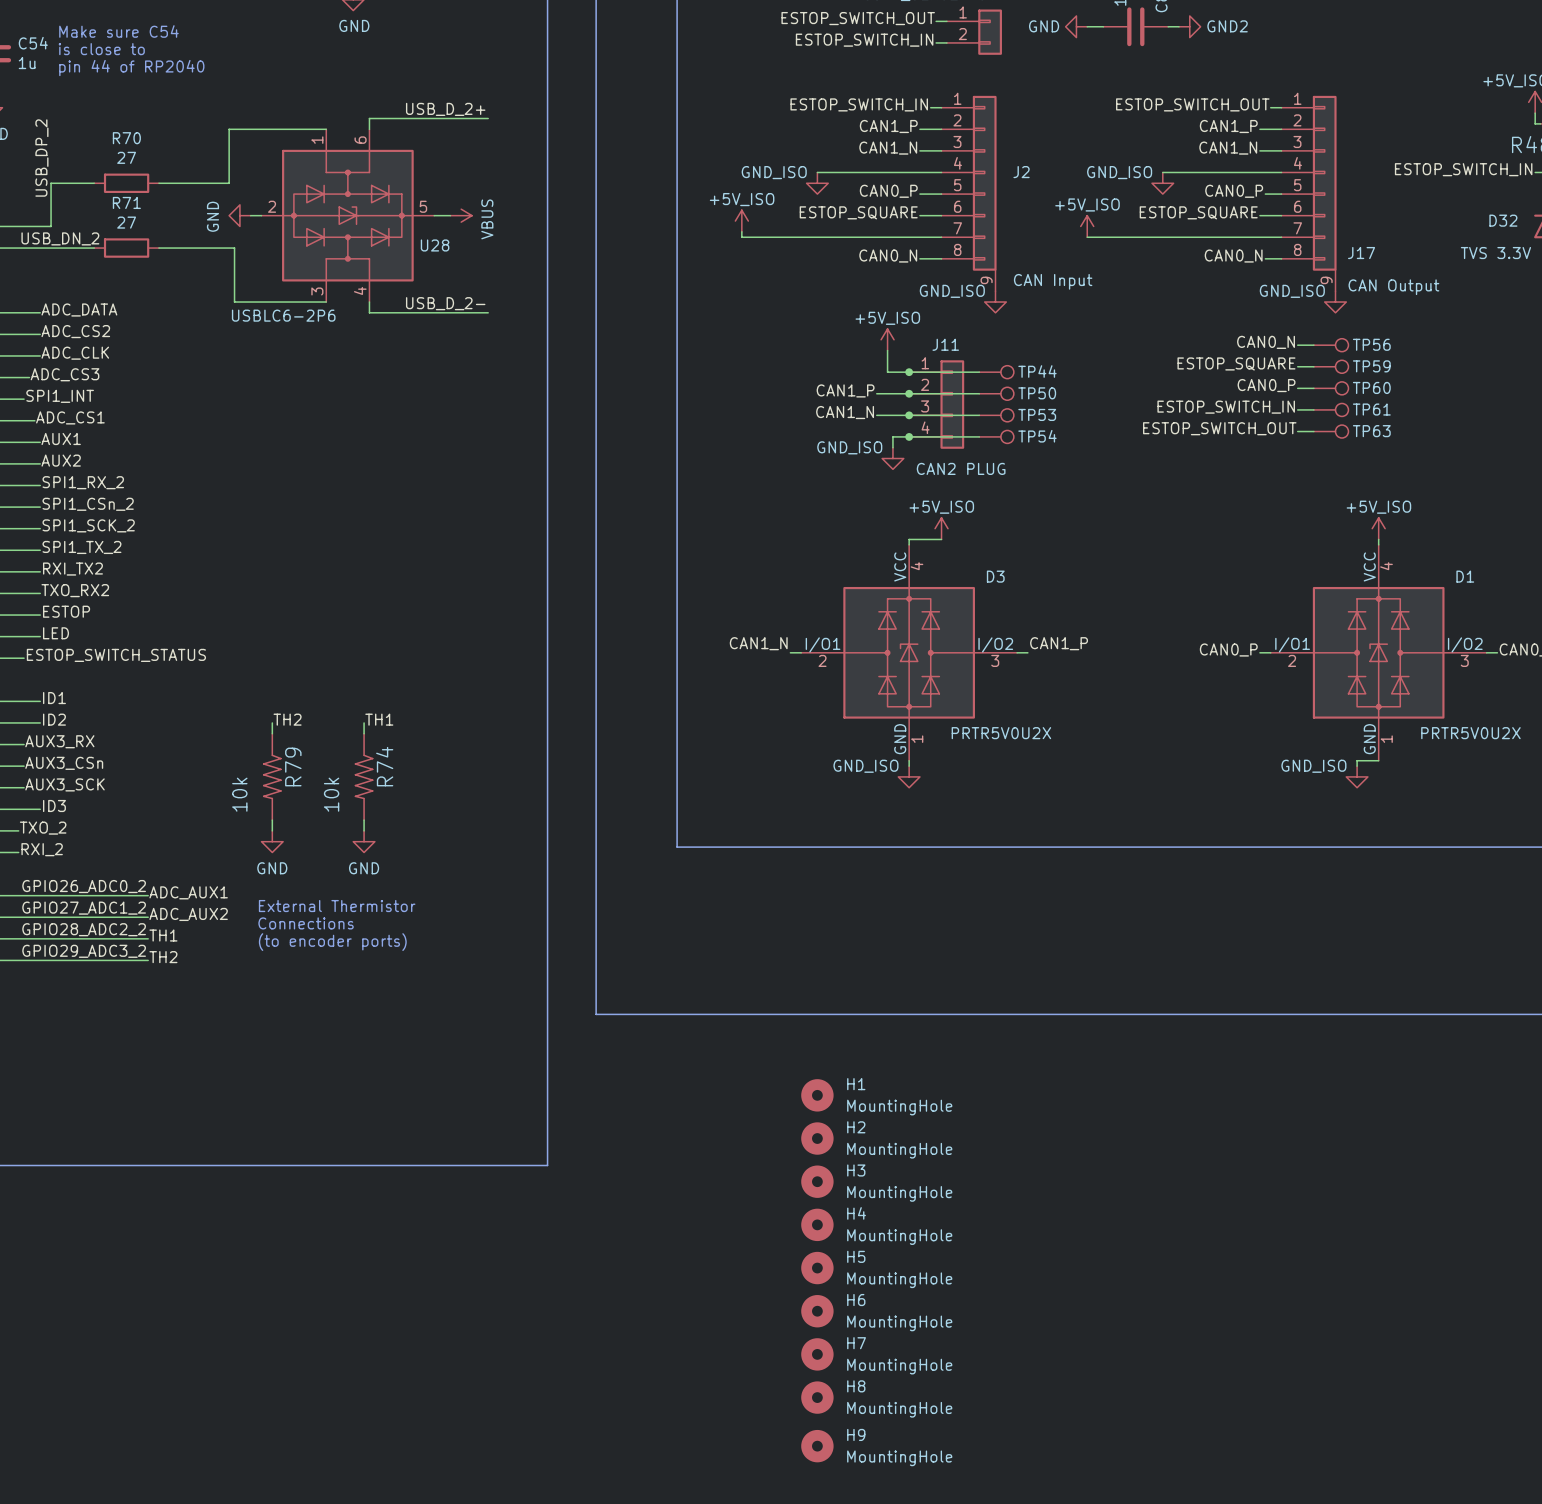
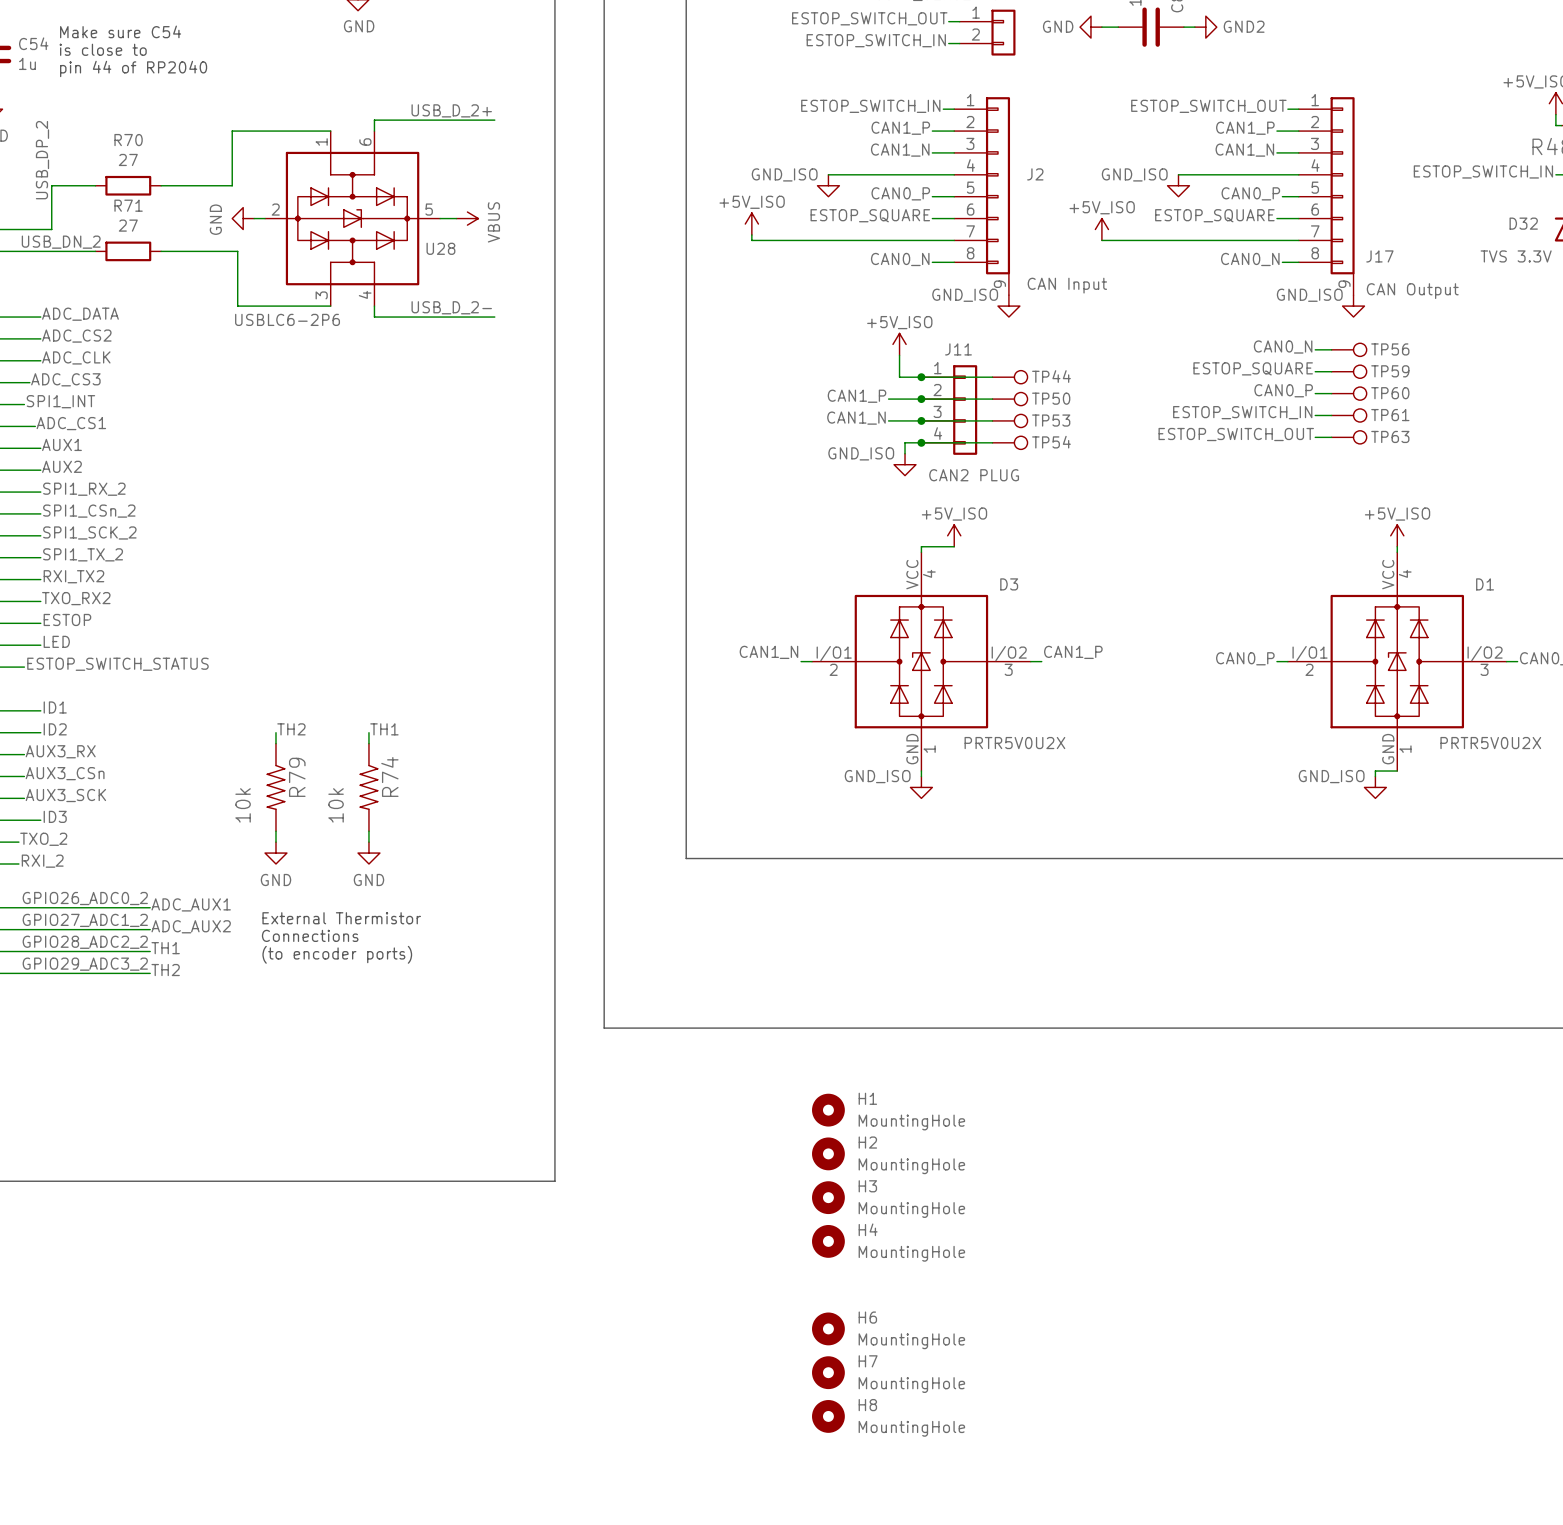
H5: MountingHole (817, 1268) -> none
H9: MountingHole (817, 1446) -> none

